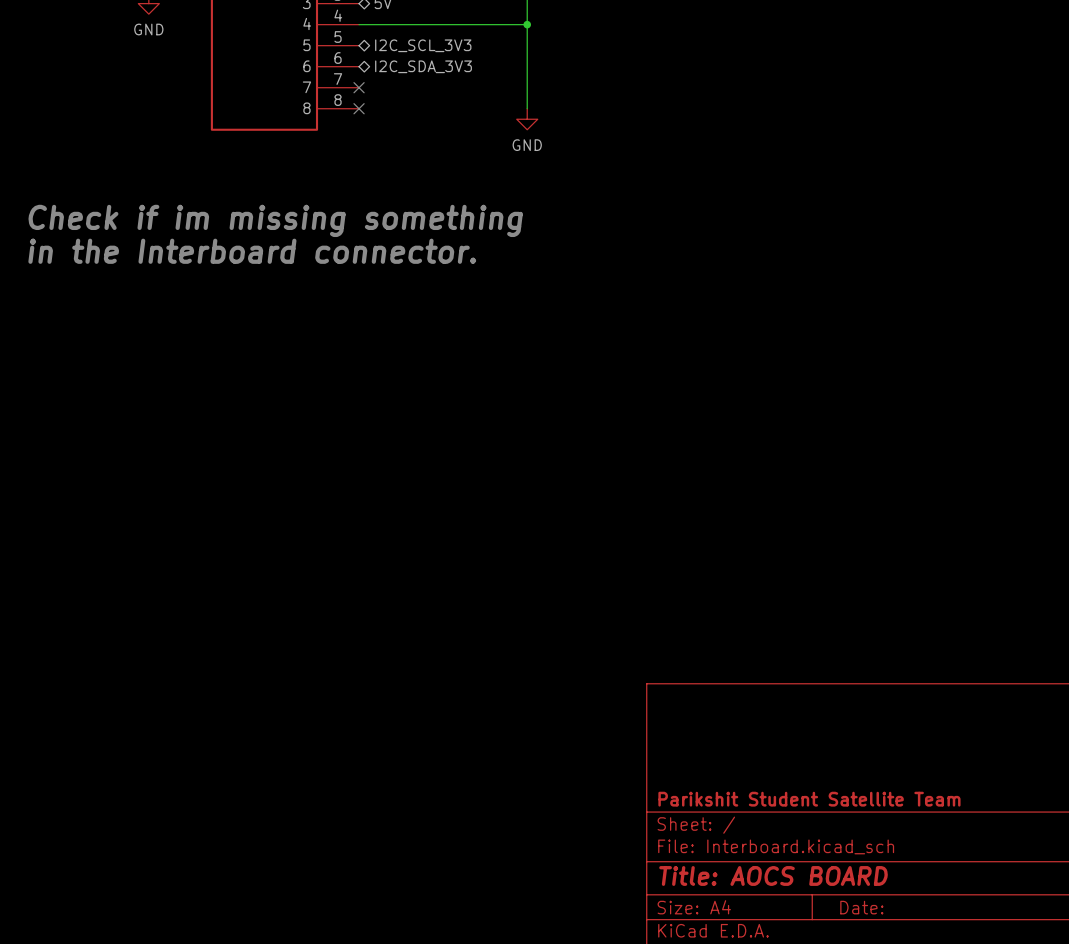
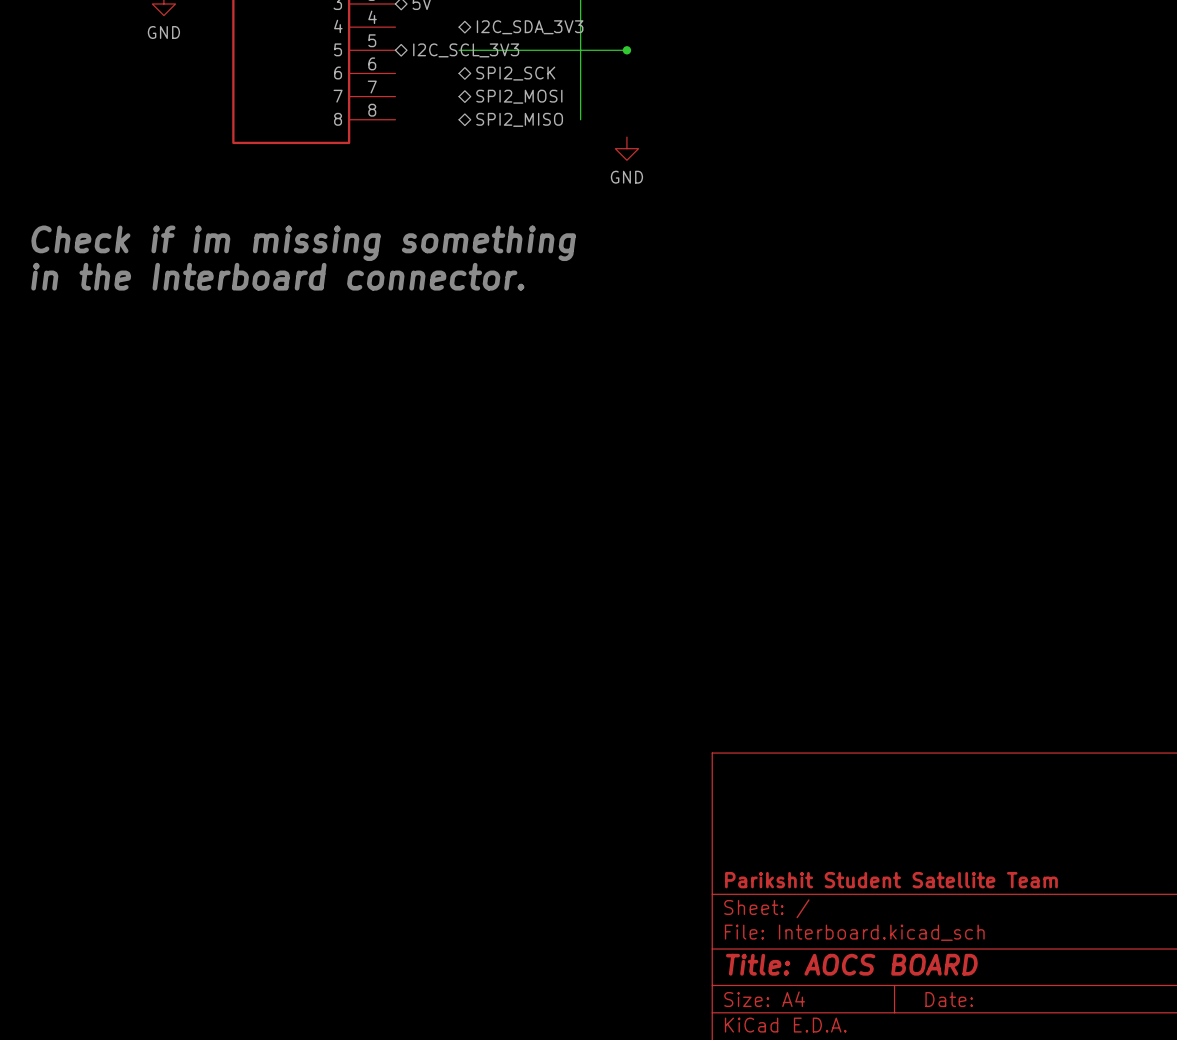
wire: (359, 24) (527, 24) -> none
junction: (527, 24) -> none
wire: none -> (459, 50) (626, 50)
junction: none -> (626, 50)
hierarchical label position: I2C_SDA_3V3 (423, 66) -> I2C_SDA_3V3 (530, 27)
hierarchical label: none -> SPI2_SCK (515, 73)
no-connect mark: (359, 87) -> none
hierarchical label: none -> SPI2_MOSI (519, 96)
no-connect mark: (359, 108) -> none
hierarchical label: none -> SPI2_MISO (519, 119)
power symbol position: GND (527, 119) -> GND (626, 148)

